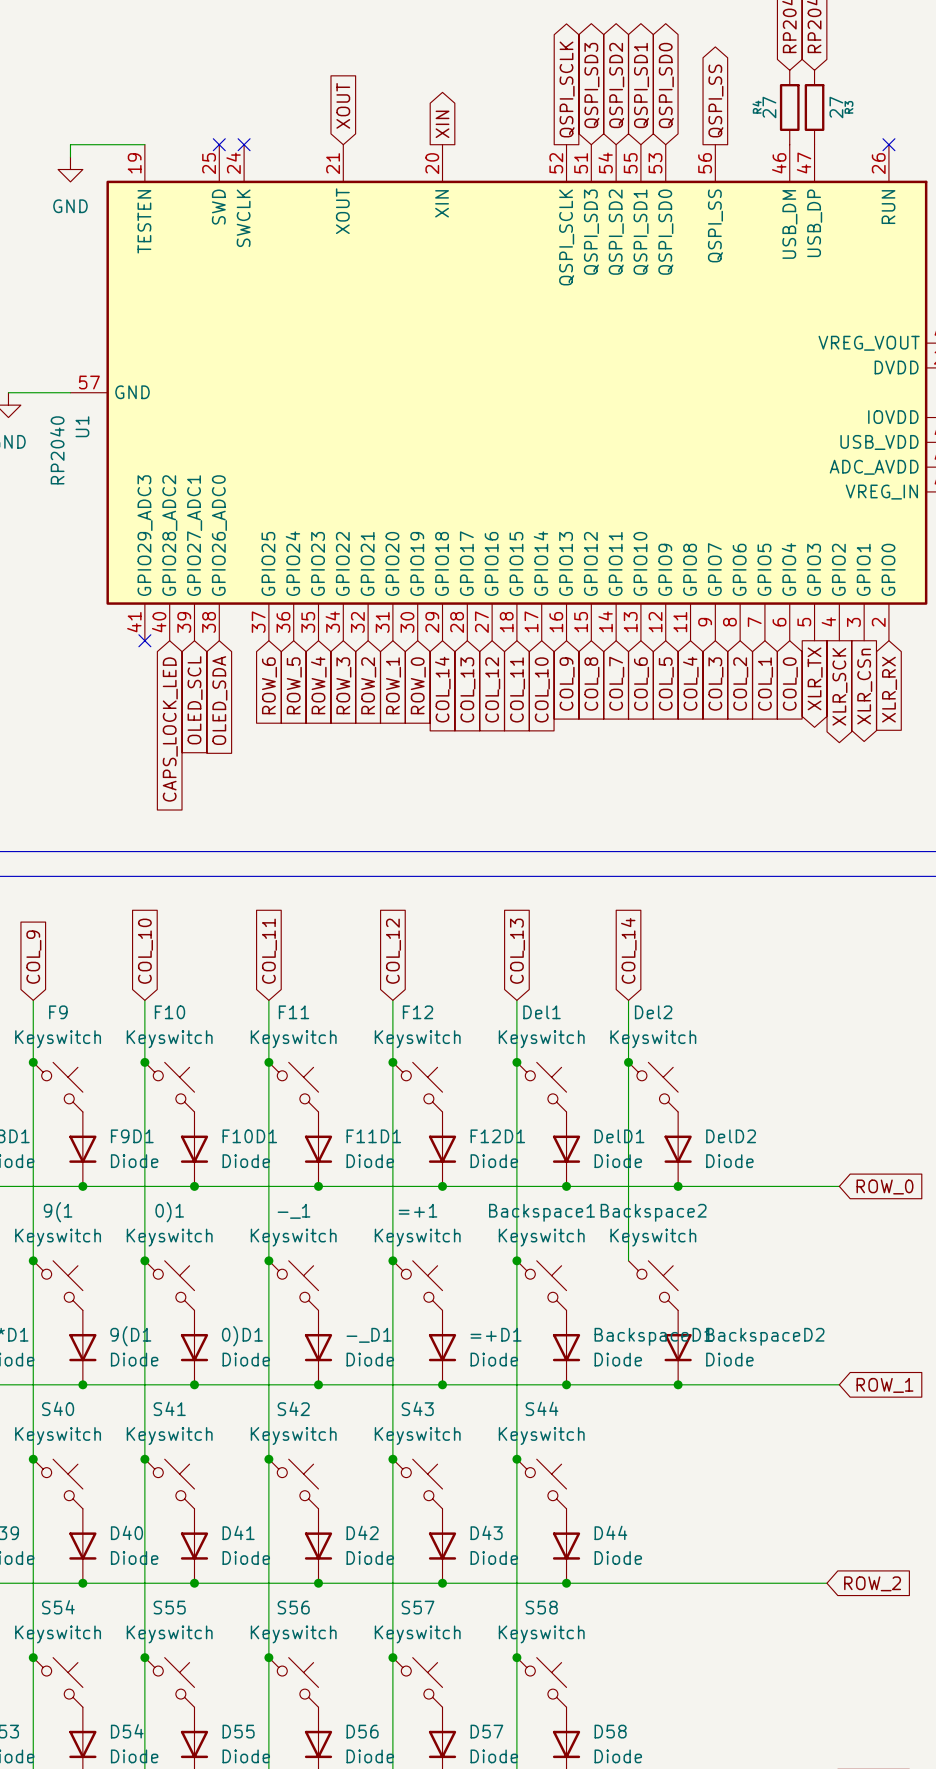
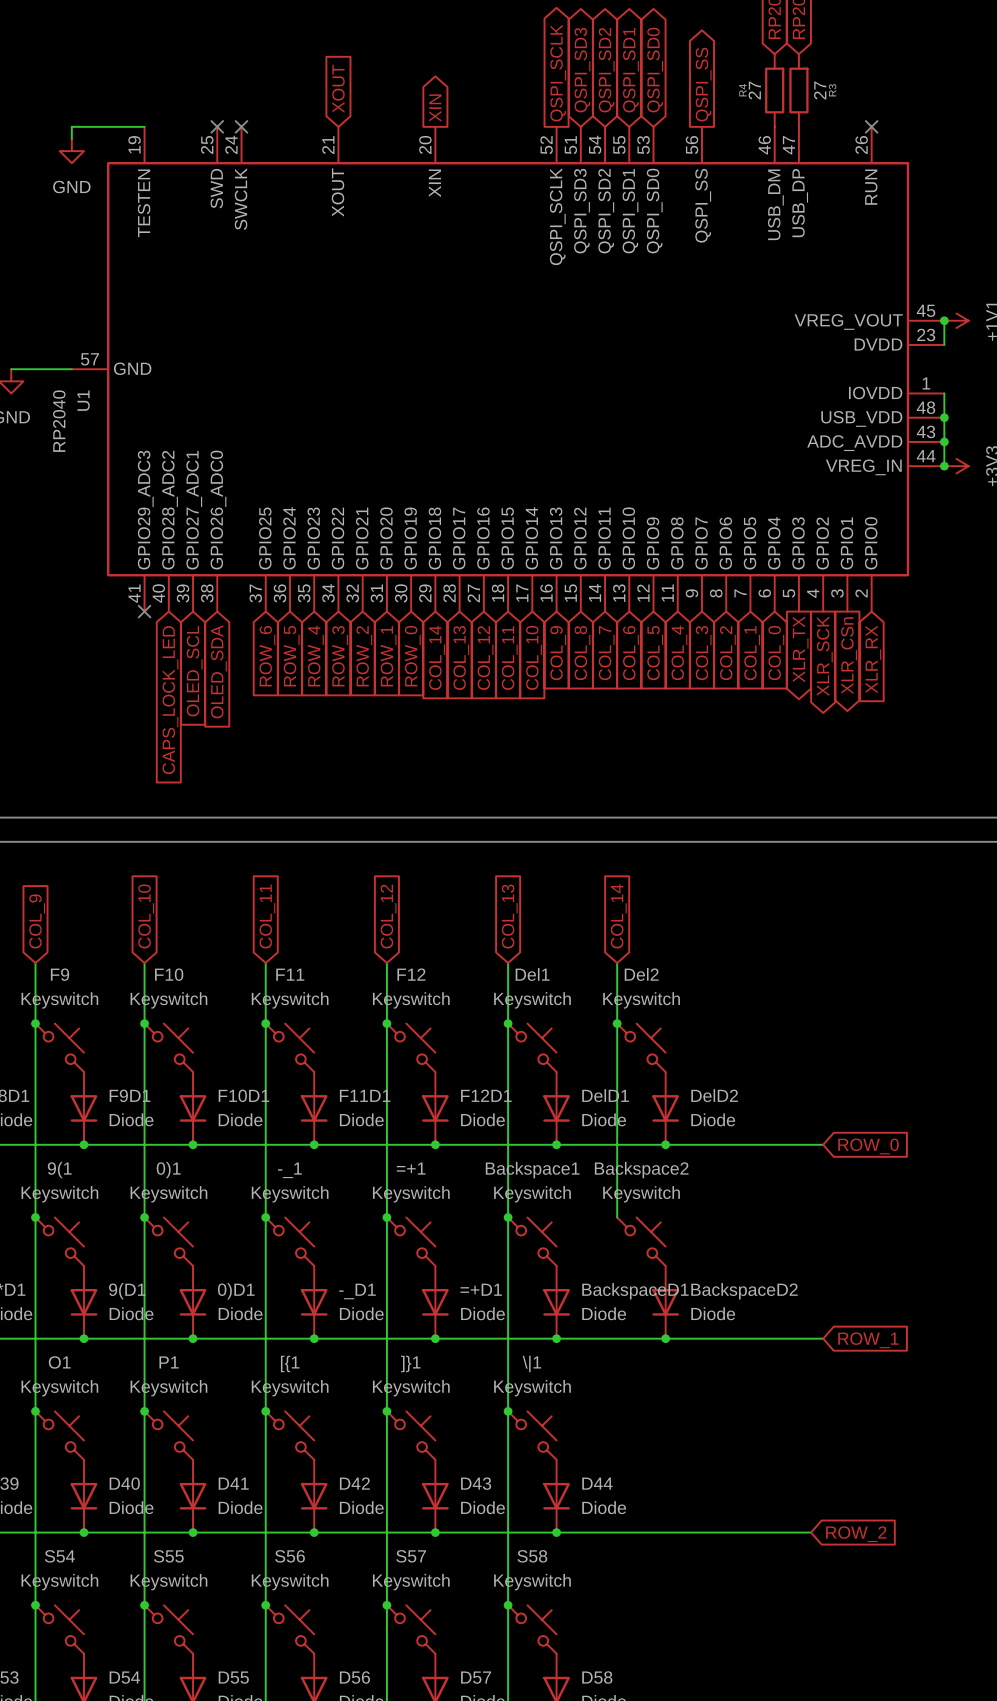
S40 name: S40 (58, 1408) -> O1 (59, 1362)
S41 name: S41 (169, 1408) -> P1 (169, 1362)
S42 name: S42 (293, 1408) -> [{1 (290, 1363)
S43 name: S43 (417, 1408) -> ]}1 (410, 1363)
S44 name: S44 (542, 1408) -> \|1 (531, 1364)

